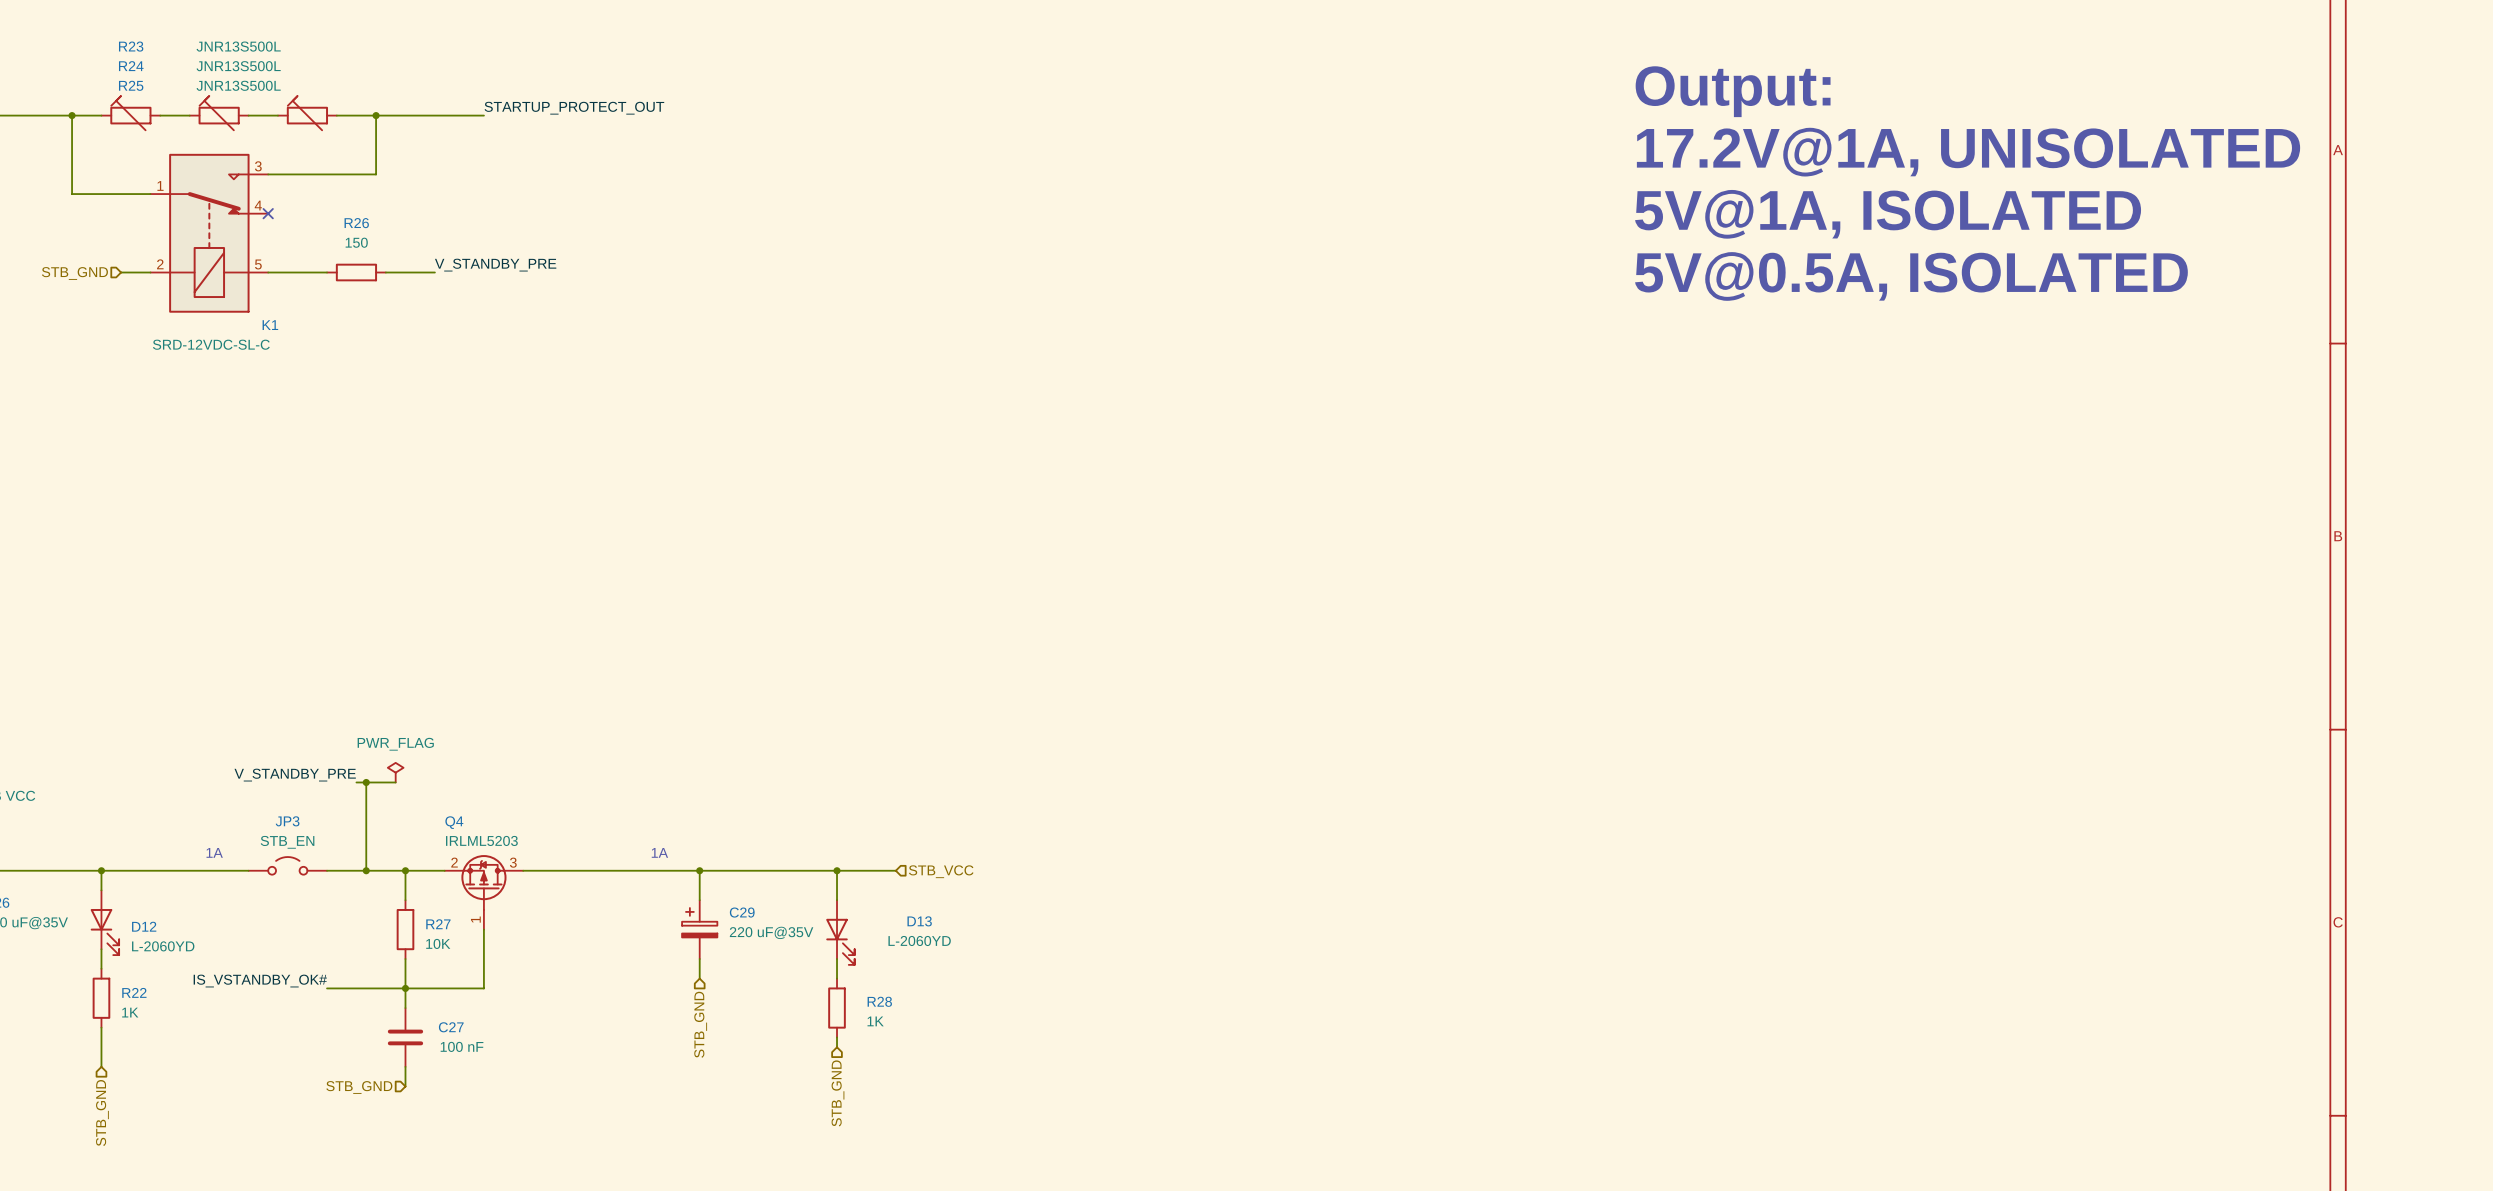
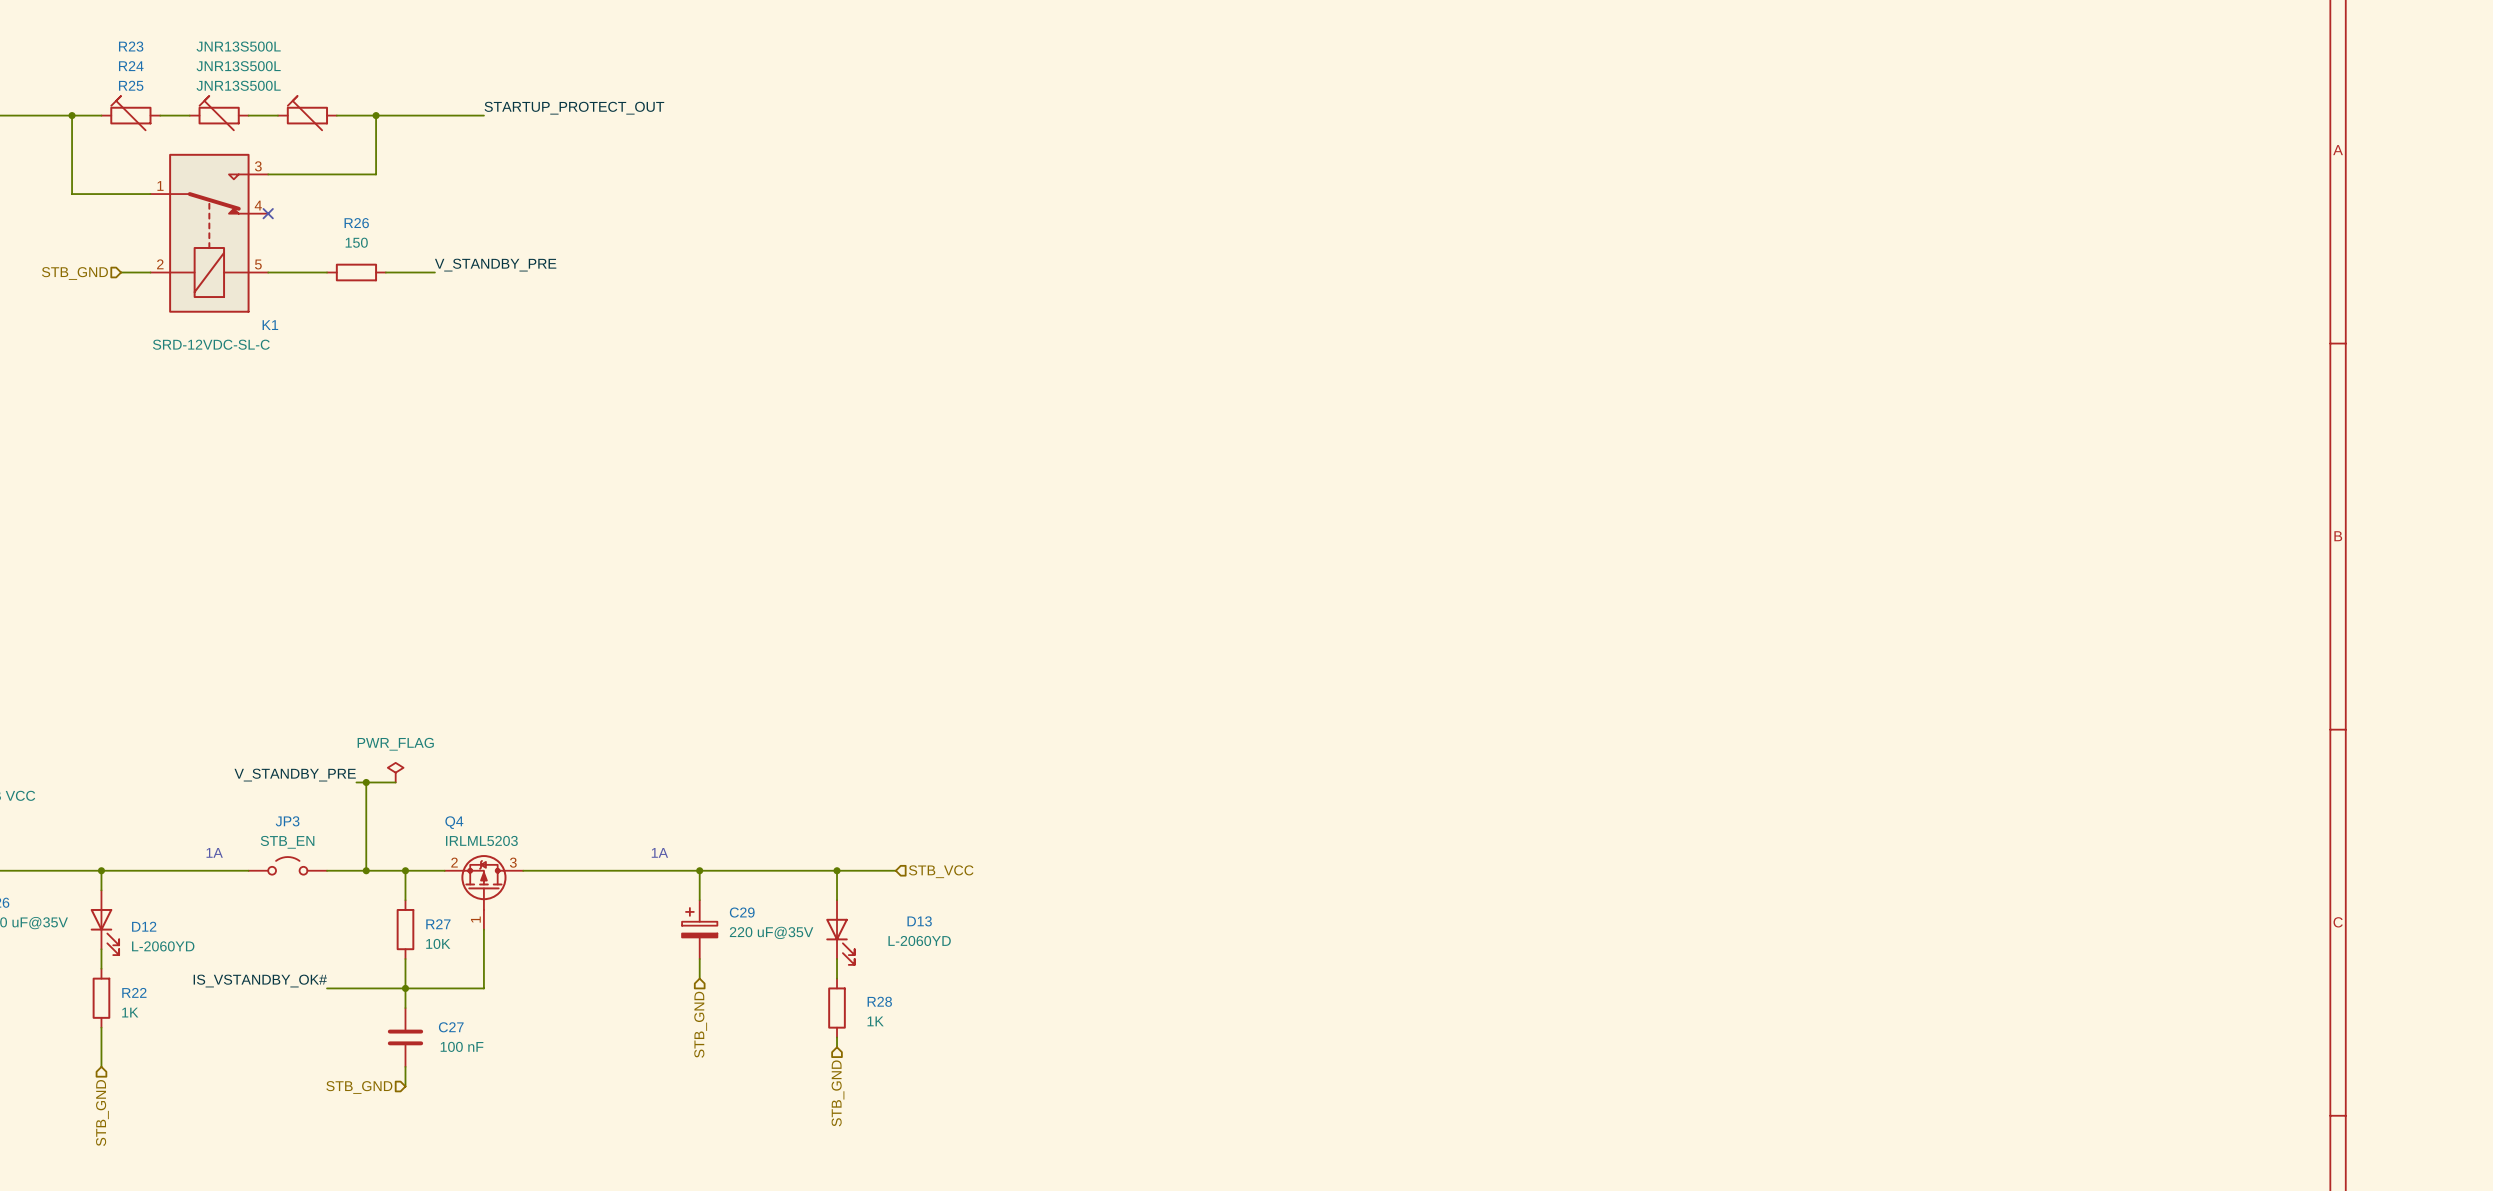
text: Output: (1733, 91) -> none
text: 17.2V@1A, UNISOLATED (1968, 152) -> none
text: 5V@1A, ISOLATED (1888, 214) -> none
text: 5V@0.5A, ISOLATED (1911, 276) -> none

